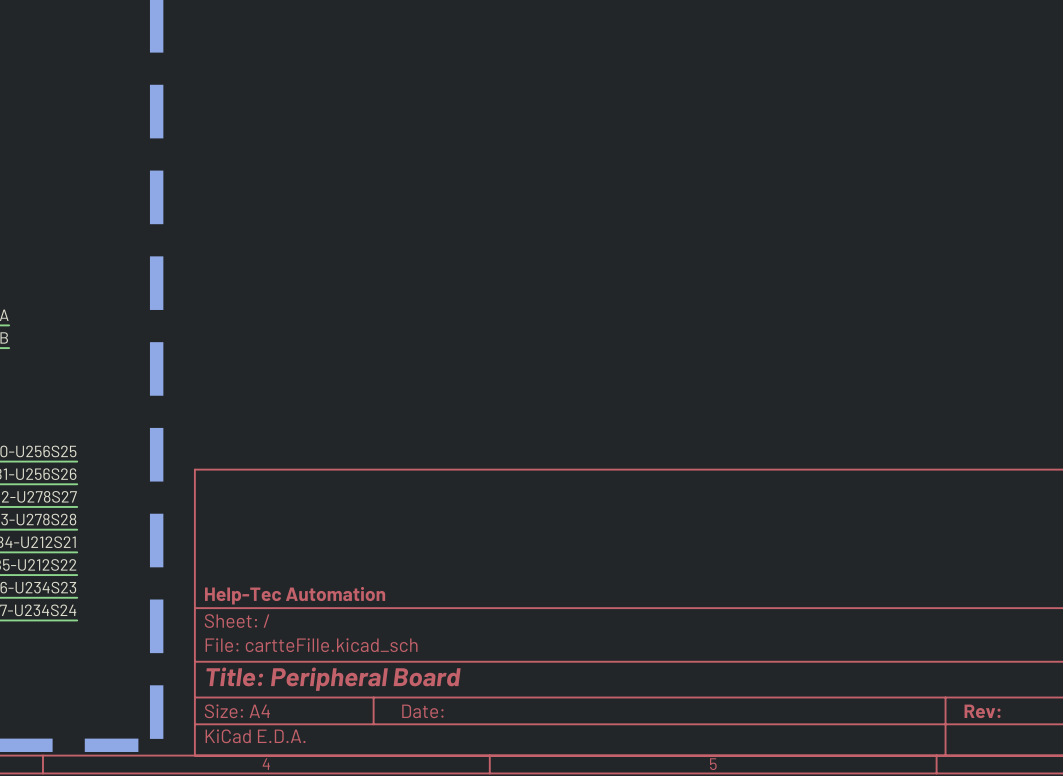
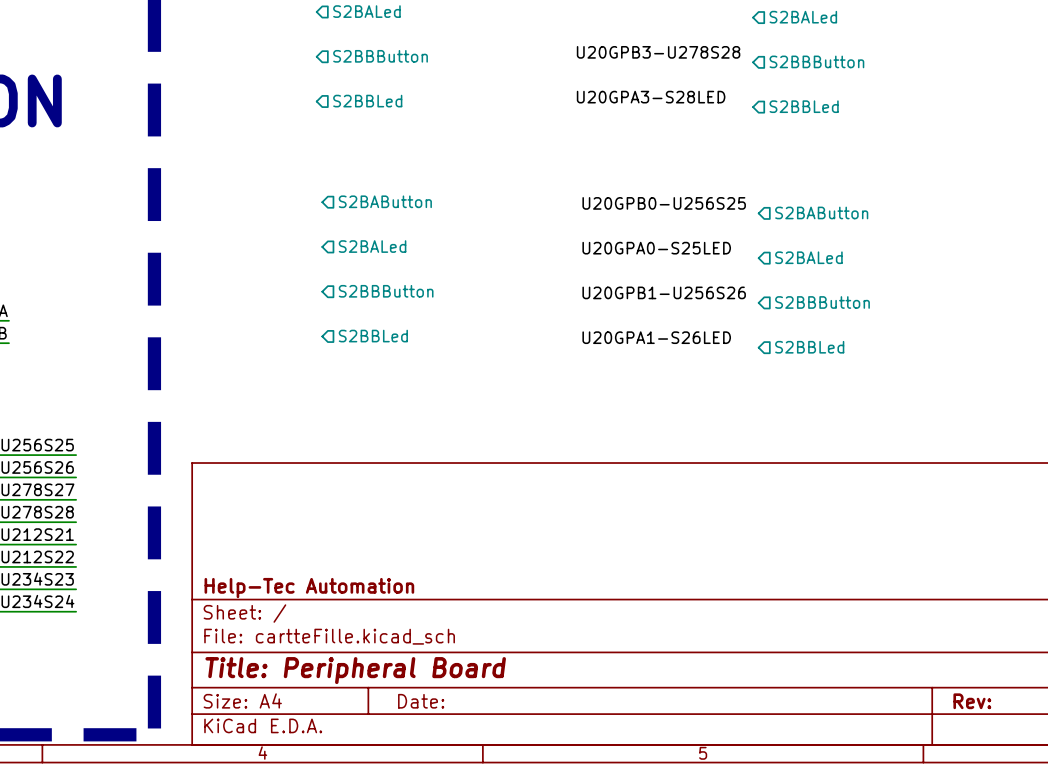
sheet pin: none -> S2BALed (366, 11)
sheet pin: none -> S2BALed (803, 17)
label: none -> U20GPB3-U278S28 (658, 52)
sheet pin: none -> S2BBButton (380, 56)
sheet pin: none -> S2BBButton (816, 61)
label: none -> U20GPA3-S28LED (651, 97)
sheet pin: none -> S2BBLed (367, 101)
sheet pin: none -> S2BBLed (804, 106)
sheet pin: none -> S2BAButton (385, 201)
label: none -> U20GPB0-U256S25 (664, 203)
sheet pin: none -> S2BAButton (821, 212)
sheet pin: none -> S2BALed (372, 246)
label: none -> U20GPA0-S25LED (656, 248)
sheet pin: none -> S2BALed (808, 257)
sheet pin: none -> S2BBButton (386, 291)
label: none -> U20GPB1-U256S26 (664, 292)
sheet pin: none -> S2BBButton (822, 302)
sheet pin: none -> S2BBLed (373, 336)
label: none -> U20GPA1-S26LED (656, 337)
sheet pin: none -> S2BBLed (809, 347)

